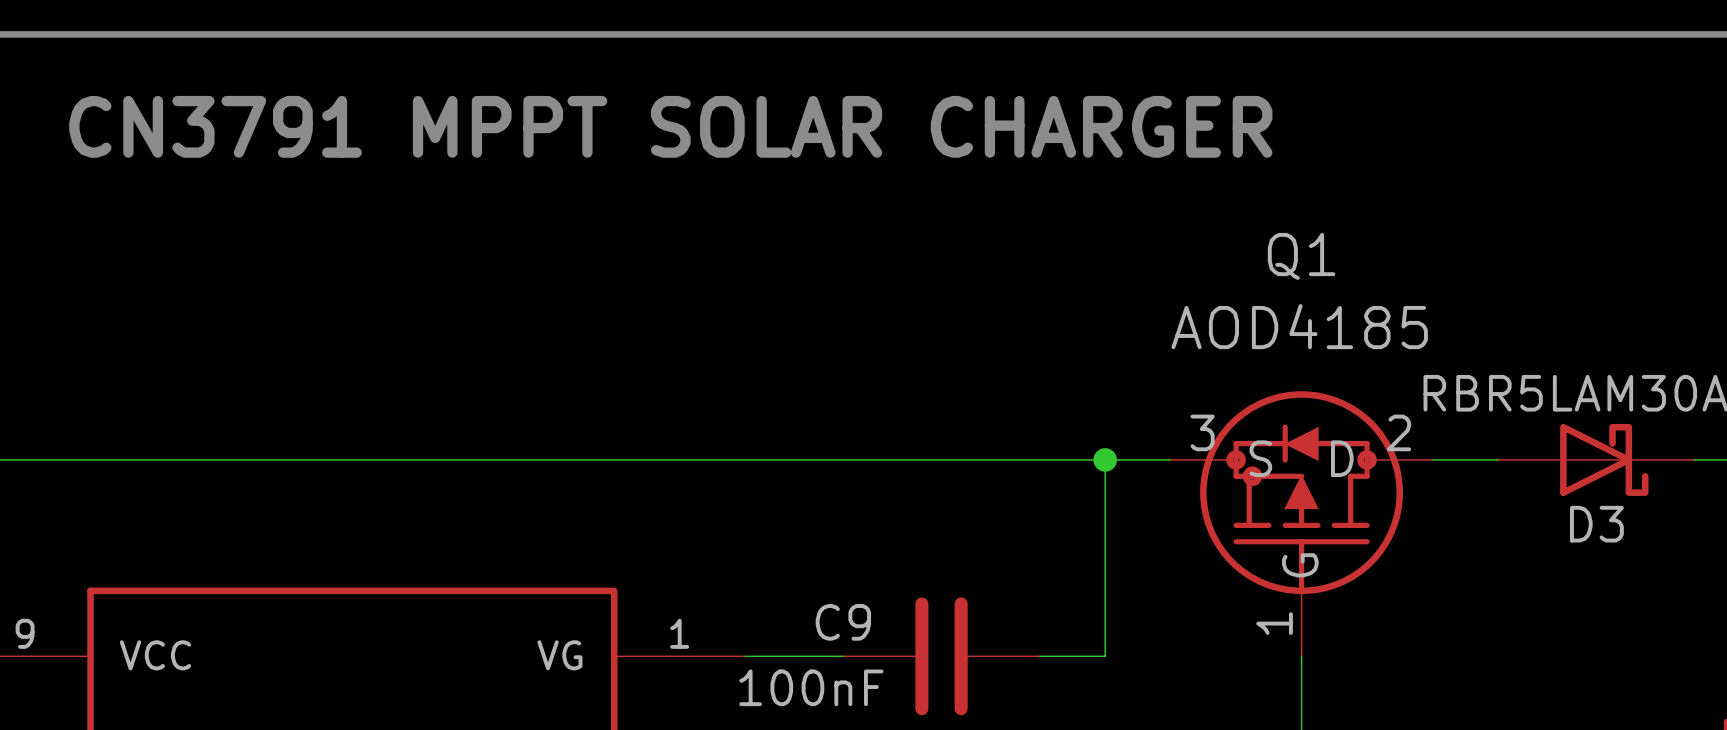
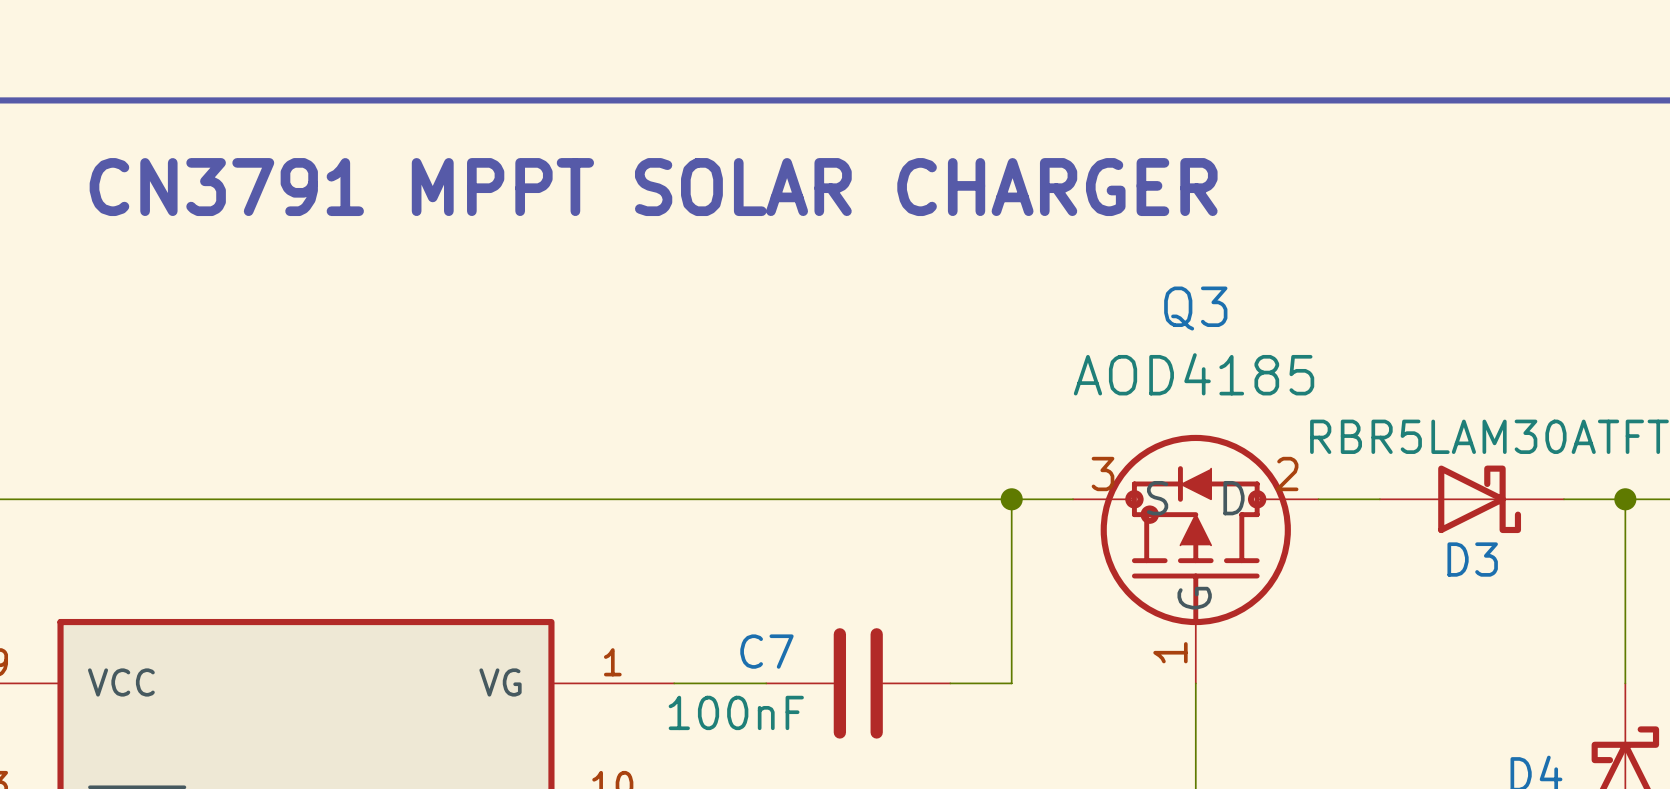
text position: CN3791 MPPT SOLAR CHARGER (670, 126) -> CN3791 MPPT SOLAR CHARGER (653, 187)
Q1 name: Q1 (1301, 256) -> Q3 (1195, 308)
C9 name: C9 (843, 622) -> C7 (766, 651)

